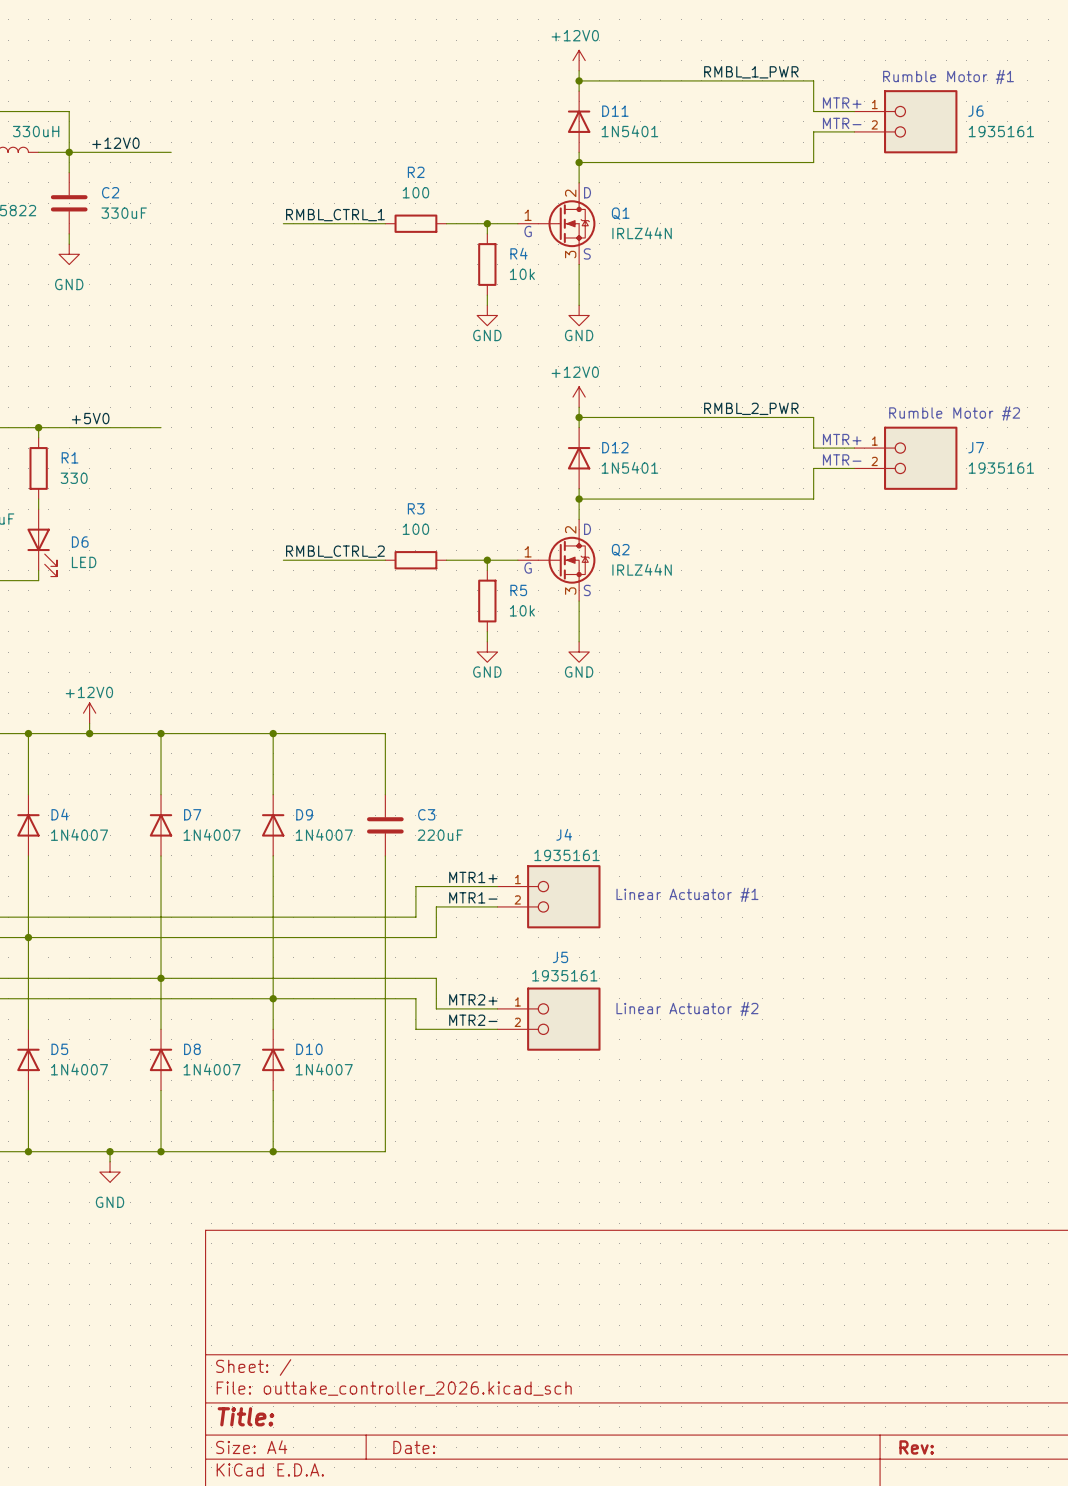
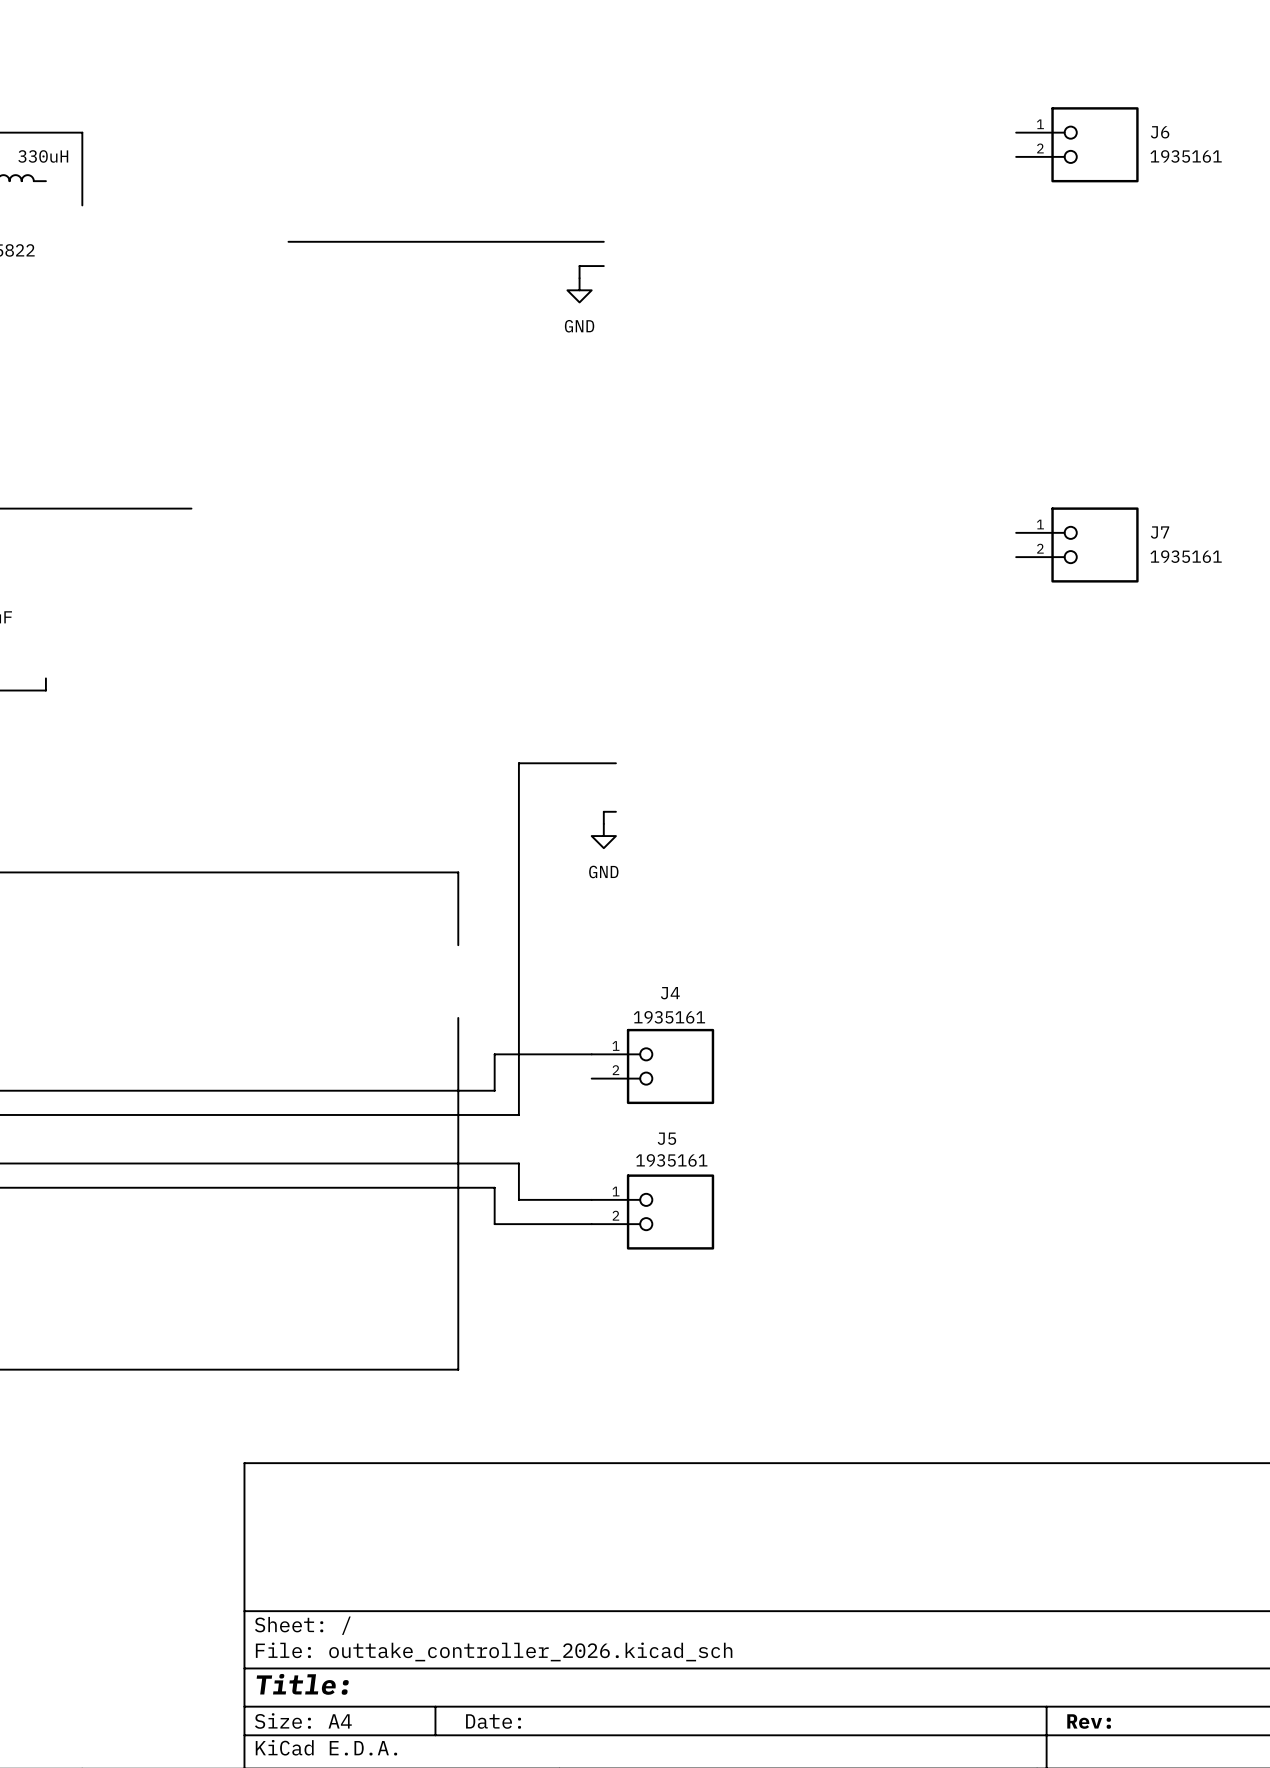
power symbol: +12V0 (579, 60) -> none
wire: (579, 70) (579, 91) -> none
label: RMBL_1_PWR (751, 72) -> none
text: Rumble Motor #1 (948, 77) -> none
wire: (579, 80) (813, 80) (813, 111) (854, 111) -> none
junction: (579, 80) -> none
text: MTR+ (842, 103) -> none
D11: 1N5401 (579, 121) -> none
text: MTR- (842, 123) -> none
wire: (854, 131) (813, 131) (813, 162) (579, 162) -> none
label: +12V0 (115, 143) -> none
wire: (38, 152) (171, 152) -> none
junction: (69, 152) -> none
wire: (579, 152) (579, 182) -> none
junction: (579, 162) -> none
text: D (587, 192) -> none
C2: 330uF (69, 203) -> none
wire: none -> (288, 241) (603, 241)
label: RMBL_CTRL_1 (335, 215) -> none
wire: (283, 223) (385, 223) -> none
R2: 100 (415, 223) -> none
wire: (446, 223) (487, 223) -> none
junction: (487, 223) -> none
wire: (507, 223) (517, 223) -> none
Q1: IRLZ44N (556, 223) -> none
text: G (528, 231) -> none
wire: (69, 233) (69, 244) -> none
power symbol: none -> GND (579, 290)
text: S (587, 253) -> none
power symbol: GND (69, 254) -> none
R4: 10k (487, 264) -> none
wire: (579, 264) (579, 305) -> none
wire: (487, 295) (487, 305) -> none
power symbol: GND (487, 315) -> none
power symbol: GND (579, 315) -> none
power symbol: +12V0 (579, 397) -> none
wire: (579, 407) (579, 427) -> none
label: RMBL_2_PWR (751, 408) -> none
text: Rumble Motor #2 (954, 413) -> none
wire: (579, 417) (813, 417) (813, 448) (854, 448) -> none
junction: (579, 417) -> none
label: +5V0 (90, 418) -> none
wire: (38, 427) (38, 437) -> none
junction: (38, 427) -> none
text: MTR+ (842, 439) -> none
D12: 1N5401 (579, 458) -> none
text: MTR- (842, 459) -> none
R1: 330 (38, 468) -> none
wire: (854, 468) (813, 468) (813, 499) (579, 499) -> none
wire: (579, 488) (579, 519) -> none
wire: (38, 499) (38, 509) -> none
junction: (579, 499) -> none
text: D (587, 529) -> none
D6: LED (42, 542) -> none
label: RMBL_CTRL_2 (335, 551) -> none
wire: (283, 560) (385, 560) -> none
R3: 100 (415, 560) -> none
wire: (446, 560) (517, 560) -> none
wire: (487, 560) (487, 570) -> none
junction: (487, 560) -> none
Q2: IRLZ44N (556, 560) -> none
text: G (528, 568) -> none
text: S (587, 590) -> none
R5: 10k (487, 601) -> none
wire: (579, 601) (579, 641) -> none
wire: (487, 631) (487, 641) -> none
power symbol: GND (487, 652) -> none
power symbol: GND (579, 652) -> none
wire: none -> (615, 811) (603, 811) (603, 823)
power symbol: none -> GND (603, 836)
power symbol: +12V0 (89, 713) -> none
wire: (89, 723) (89, 733) -> none
wire: (28, 733) (28, 794) -> none
junction: (28, 733) -> none
junction: (89, 733) -> none
wire: (161, 733) (161, 794) -> none
junction: (161, 733) -> none
wire: (273, 733) (273, 794) -> none
junction: (273, 733) -> none
D4: 1N4007 (28, 825) -> none
D7: 1N4007 (161, 825) -> none
D9: 1N4007 (273, 825) -> none
C3: 220uF (385, 825) -> none
wire: (28, 855) (28, 1029) -> none
wire: (161, 855) (161, 1029) -> none
wire: (273, 855) (273, 1029) -> none
label: MTR1+ (473, 877) -> none
text: Linear Actuator #1 (687, 894) -> none
label: MTR1- (473, 897) -> none
wire: (436, 906) (497, 906) -> (518, 1078) (518, 763) (615, 763)
junction: (28, 937) -> none
junction: (161, 978) -> none
junction: (273, 998) -> none
label: MTR2+ (473, 999) -> none
text: Linear Actuator #2 (687, 1009) -> none
label: MTR2- (473, 1020) -> none
D5: 1N4007 (28, 1059) -> none
D8: 1N4007 (161, 1059) -> none
D10: 1N4007 (273, 1059) -> none
wire: (28, 1090) (28, 1151) -> none
wire: (161, 1090) (161, 1151) -> none
wire: (273, 1090) (273, 1151) -> none
junction: (28, 1151) -> none
wire: (110, 1151) (110, 1161) -> none
junction: (110, 1151) -> none
junction: (161, 1151) -> none
junction: (273, 1151) -> none
power symbol: GND (110, 1172) -> none

